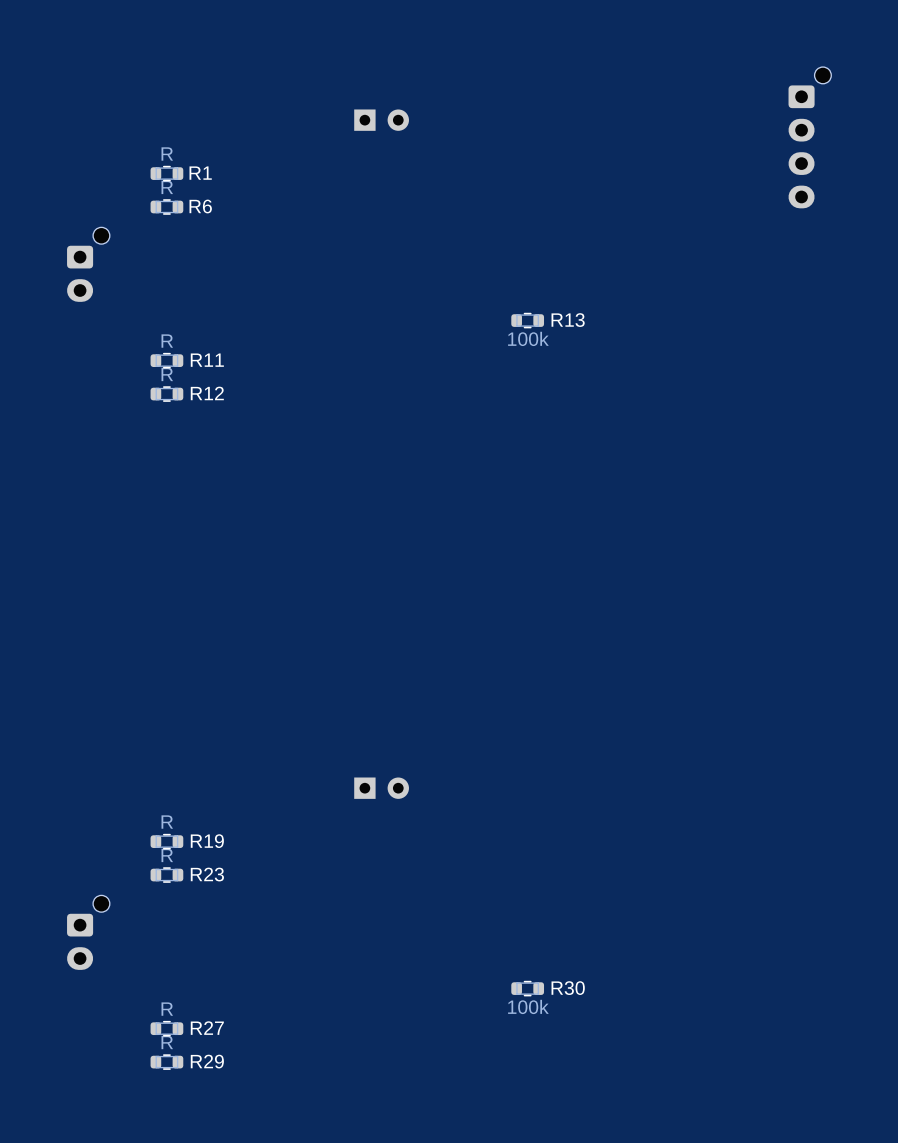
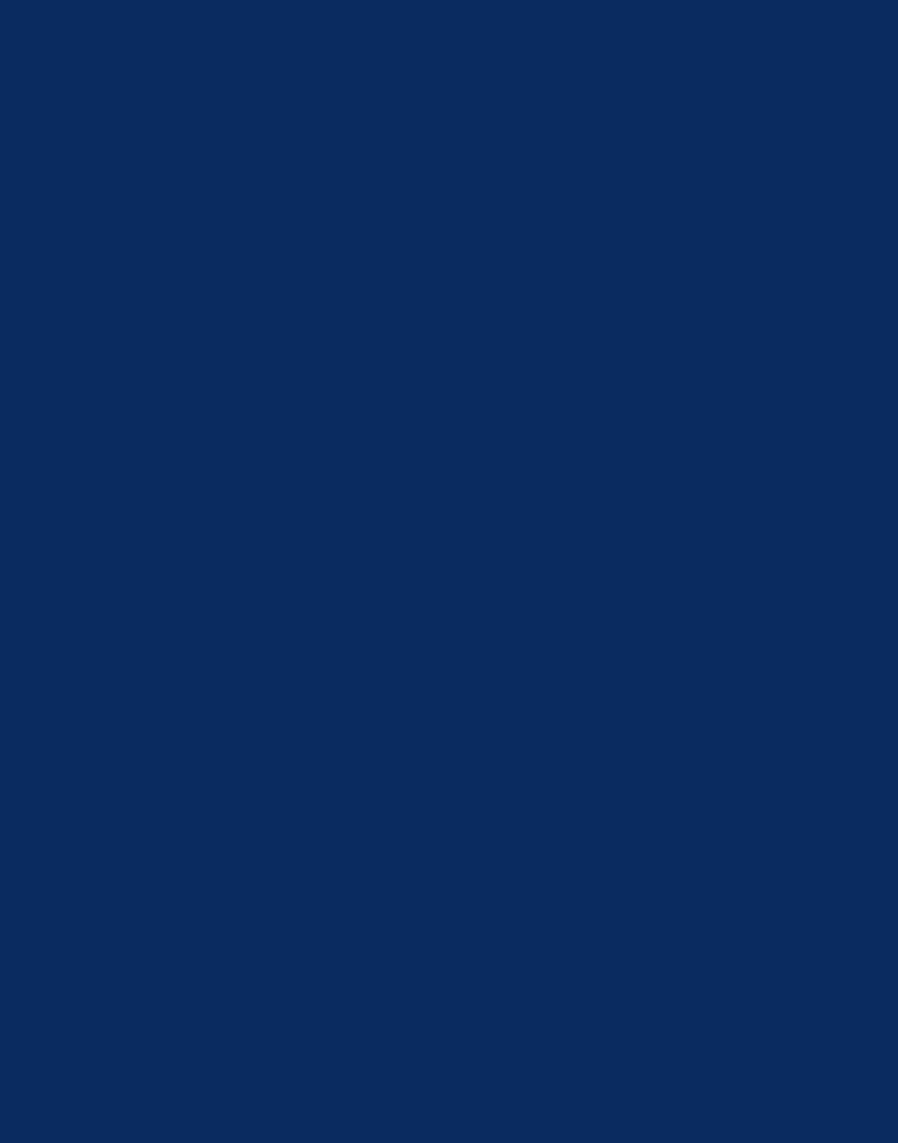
part: (381, 120) -> none
part: (809, 137) -> none
R1: R (166, 173) -> none
R6: R (166, 207) -> none
part: (88, 264) -> none
R13: 100k (527, 320) -> none
R11: R (166, 360) -> none
R12: R (166, 394) -> none
part: (381, 788) -> none
R19: R (166, 841) -> none
R23: R (166, 875) -> none
part: (88, 932) -> none
R30: 100k (527, 988) -> none
R27: R (166, 1028) -> none
R29: R (166, 1062) -> none

